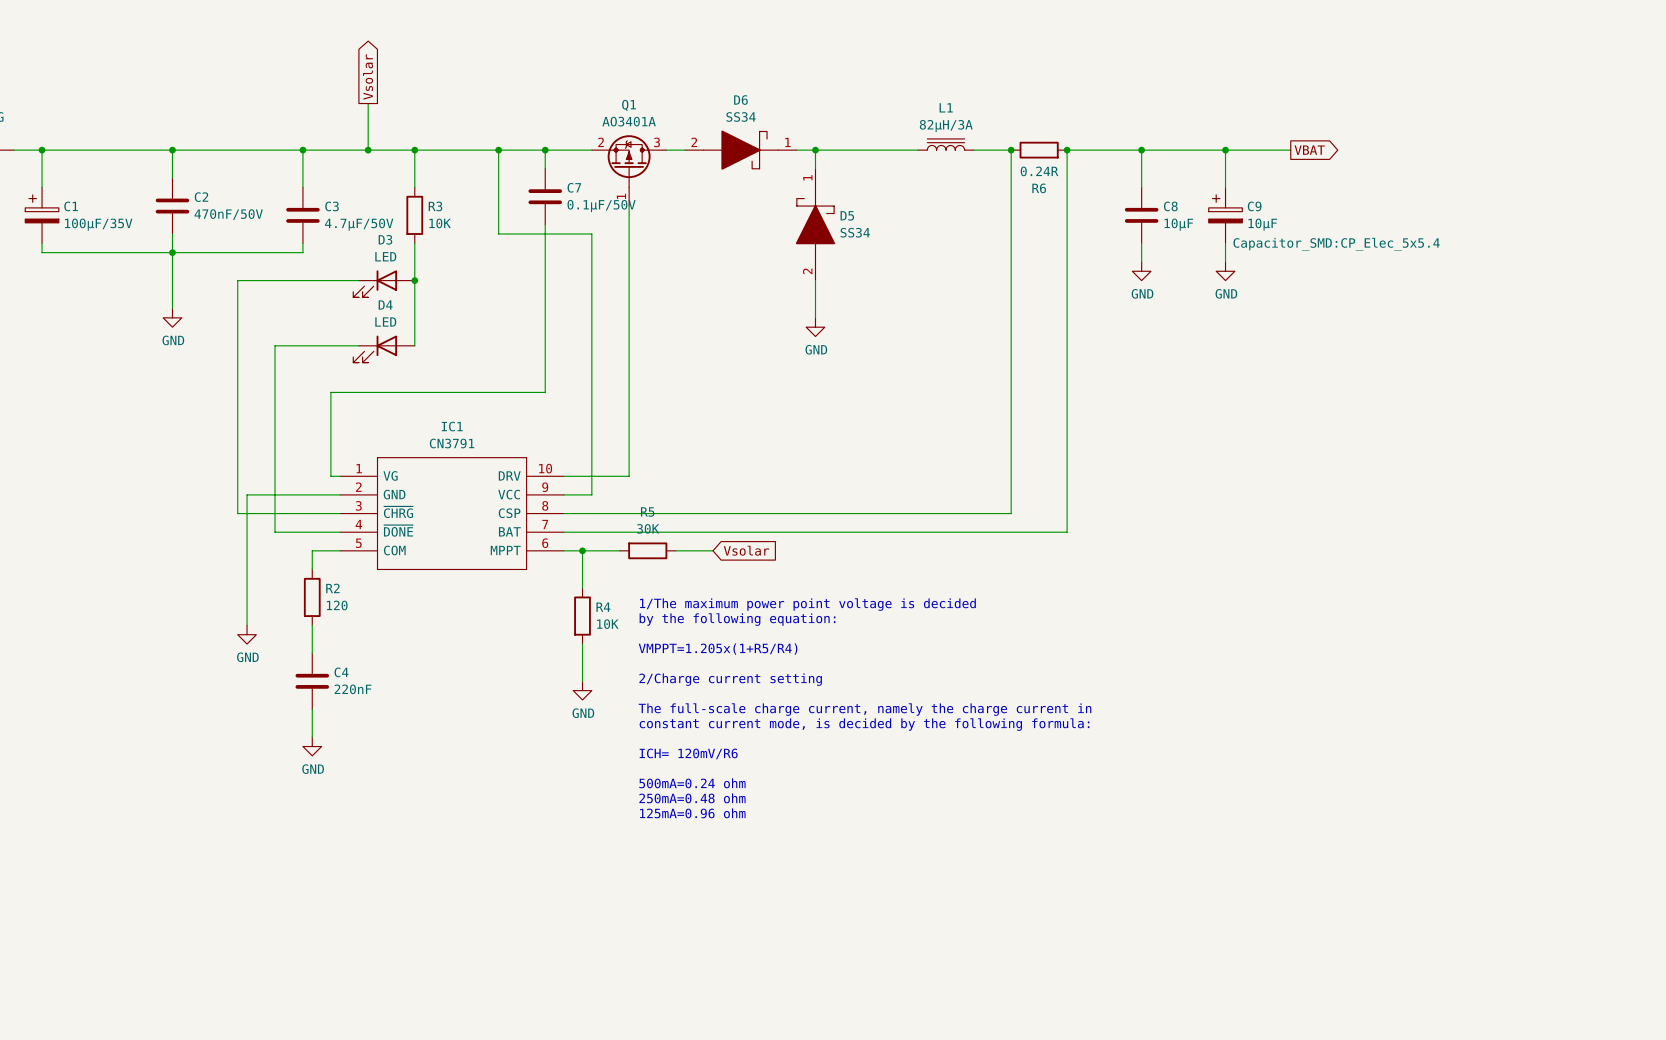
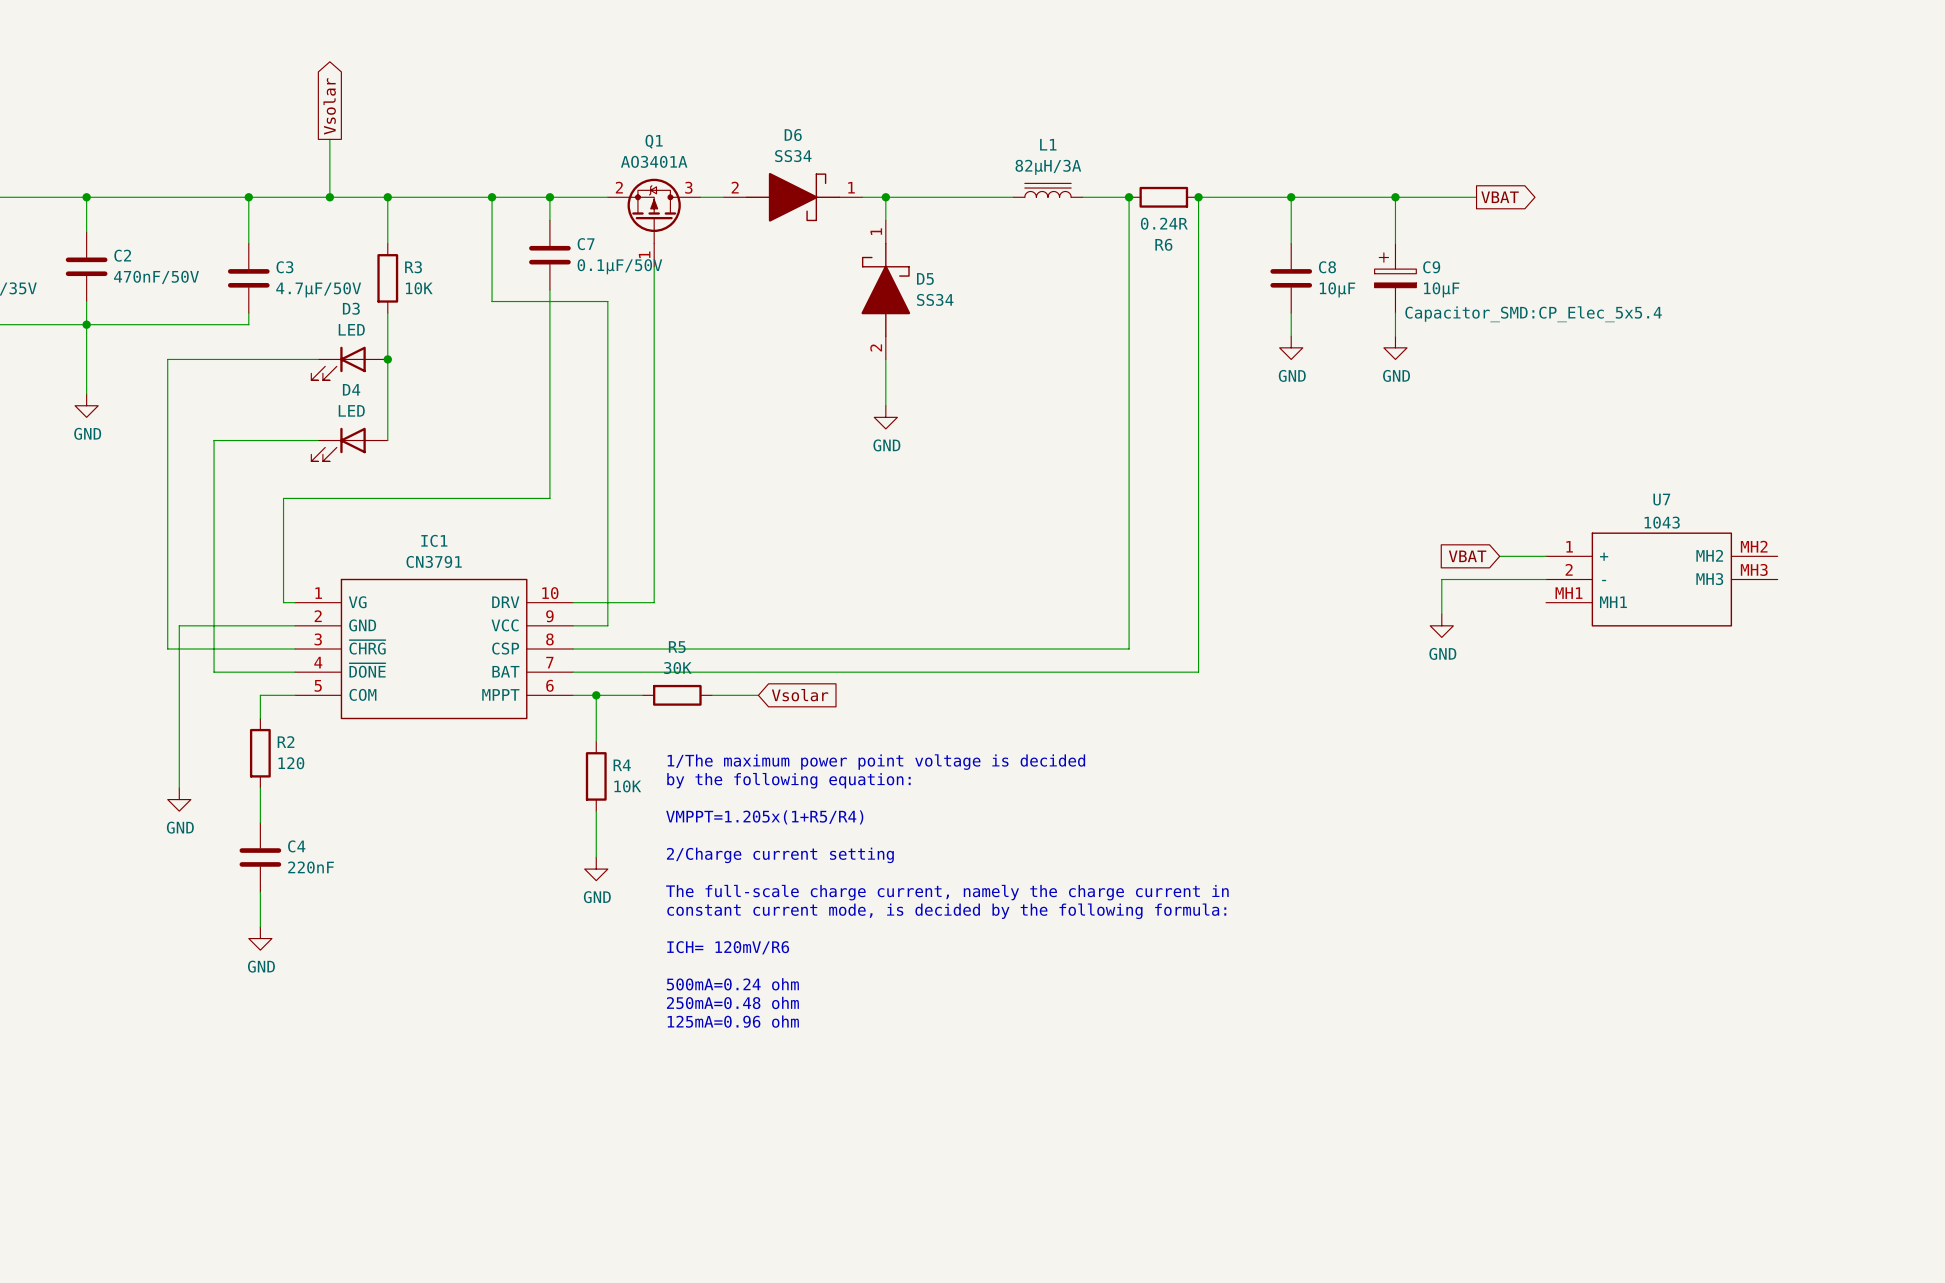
global label: none -> VBAT (1467, 556)
wire: none -> (1499, 556) (1546, 556)
wire: none -> (1546, 579) (1441, 579) (1441, 614)
U7: none -> 1043 (1661, 579)
power symbol: none -> GND (1441, 625)

